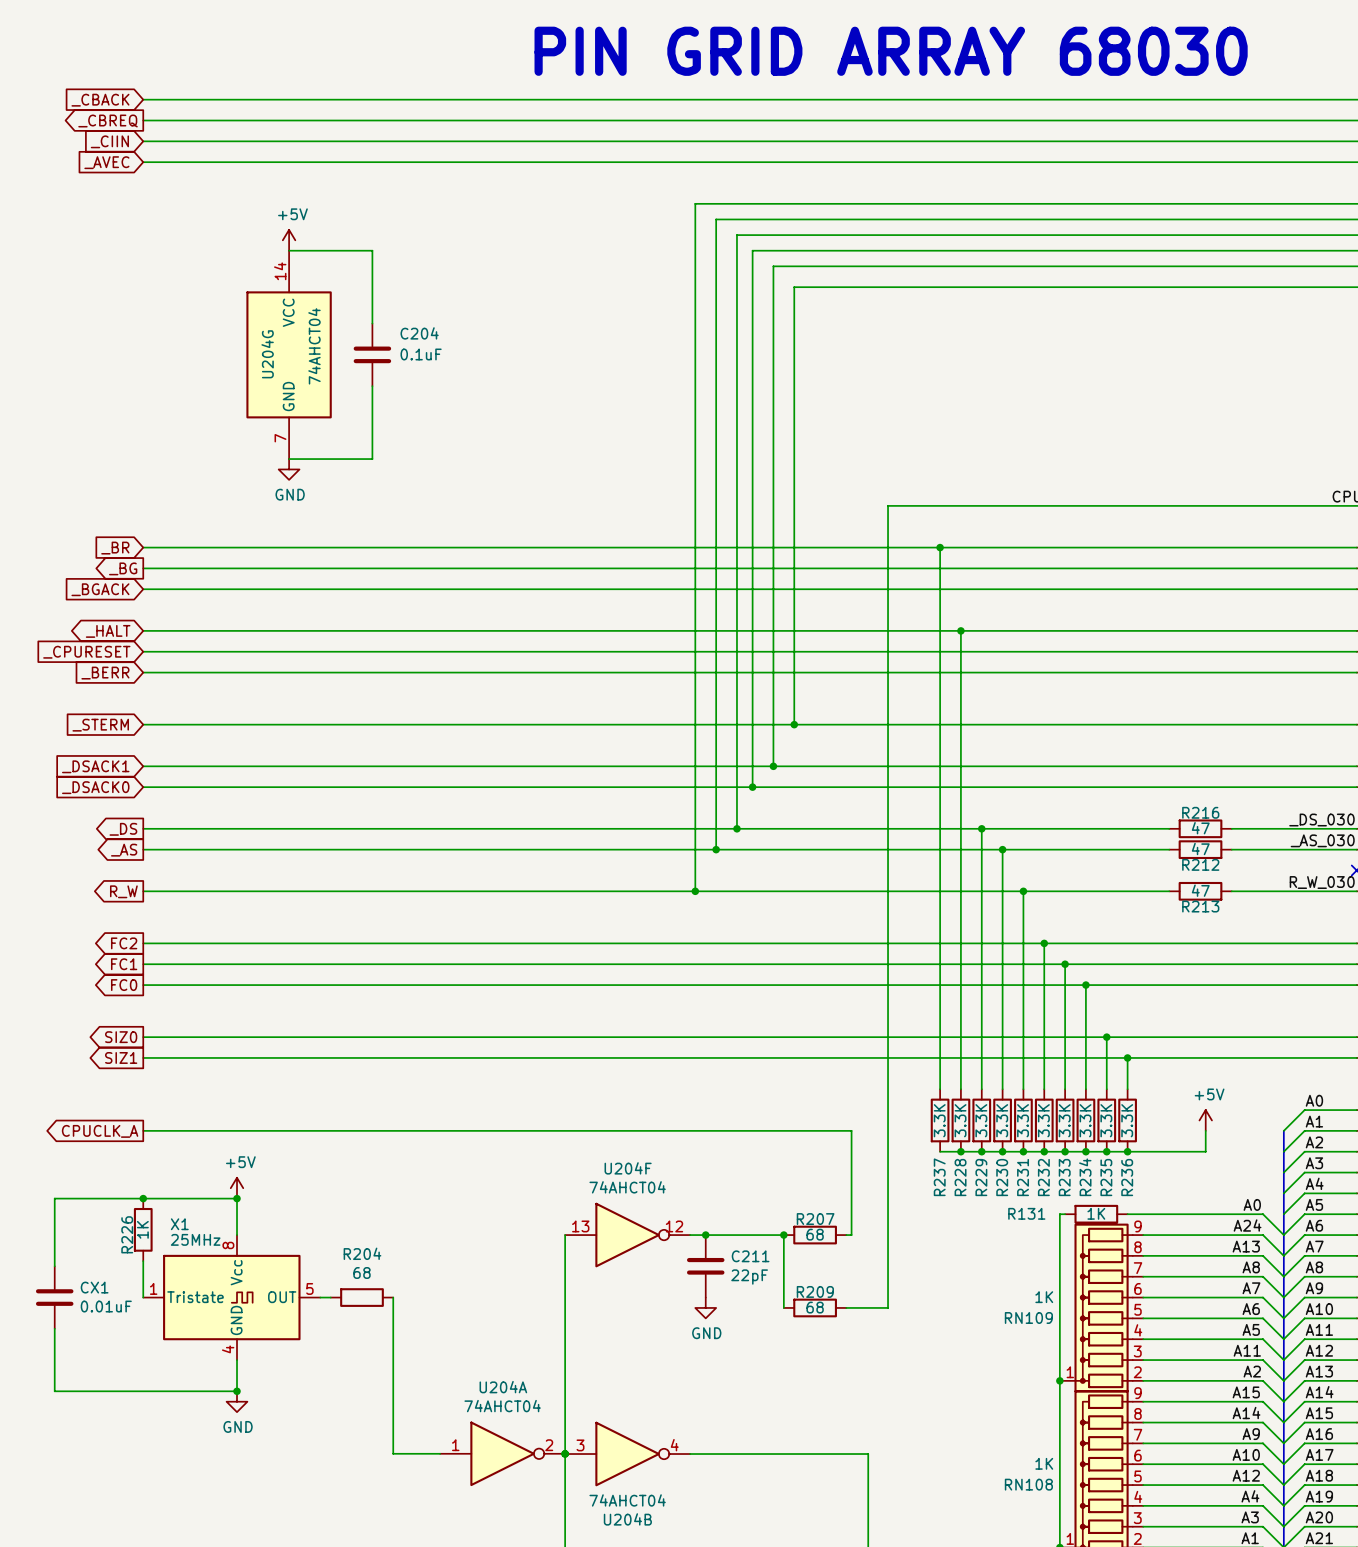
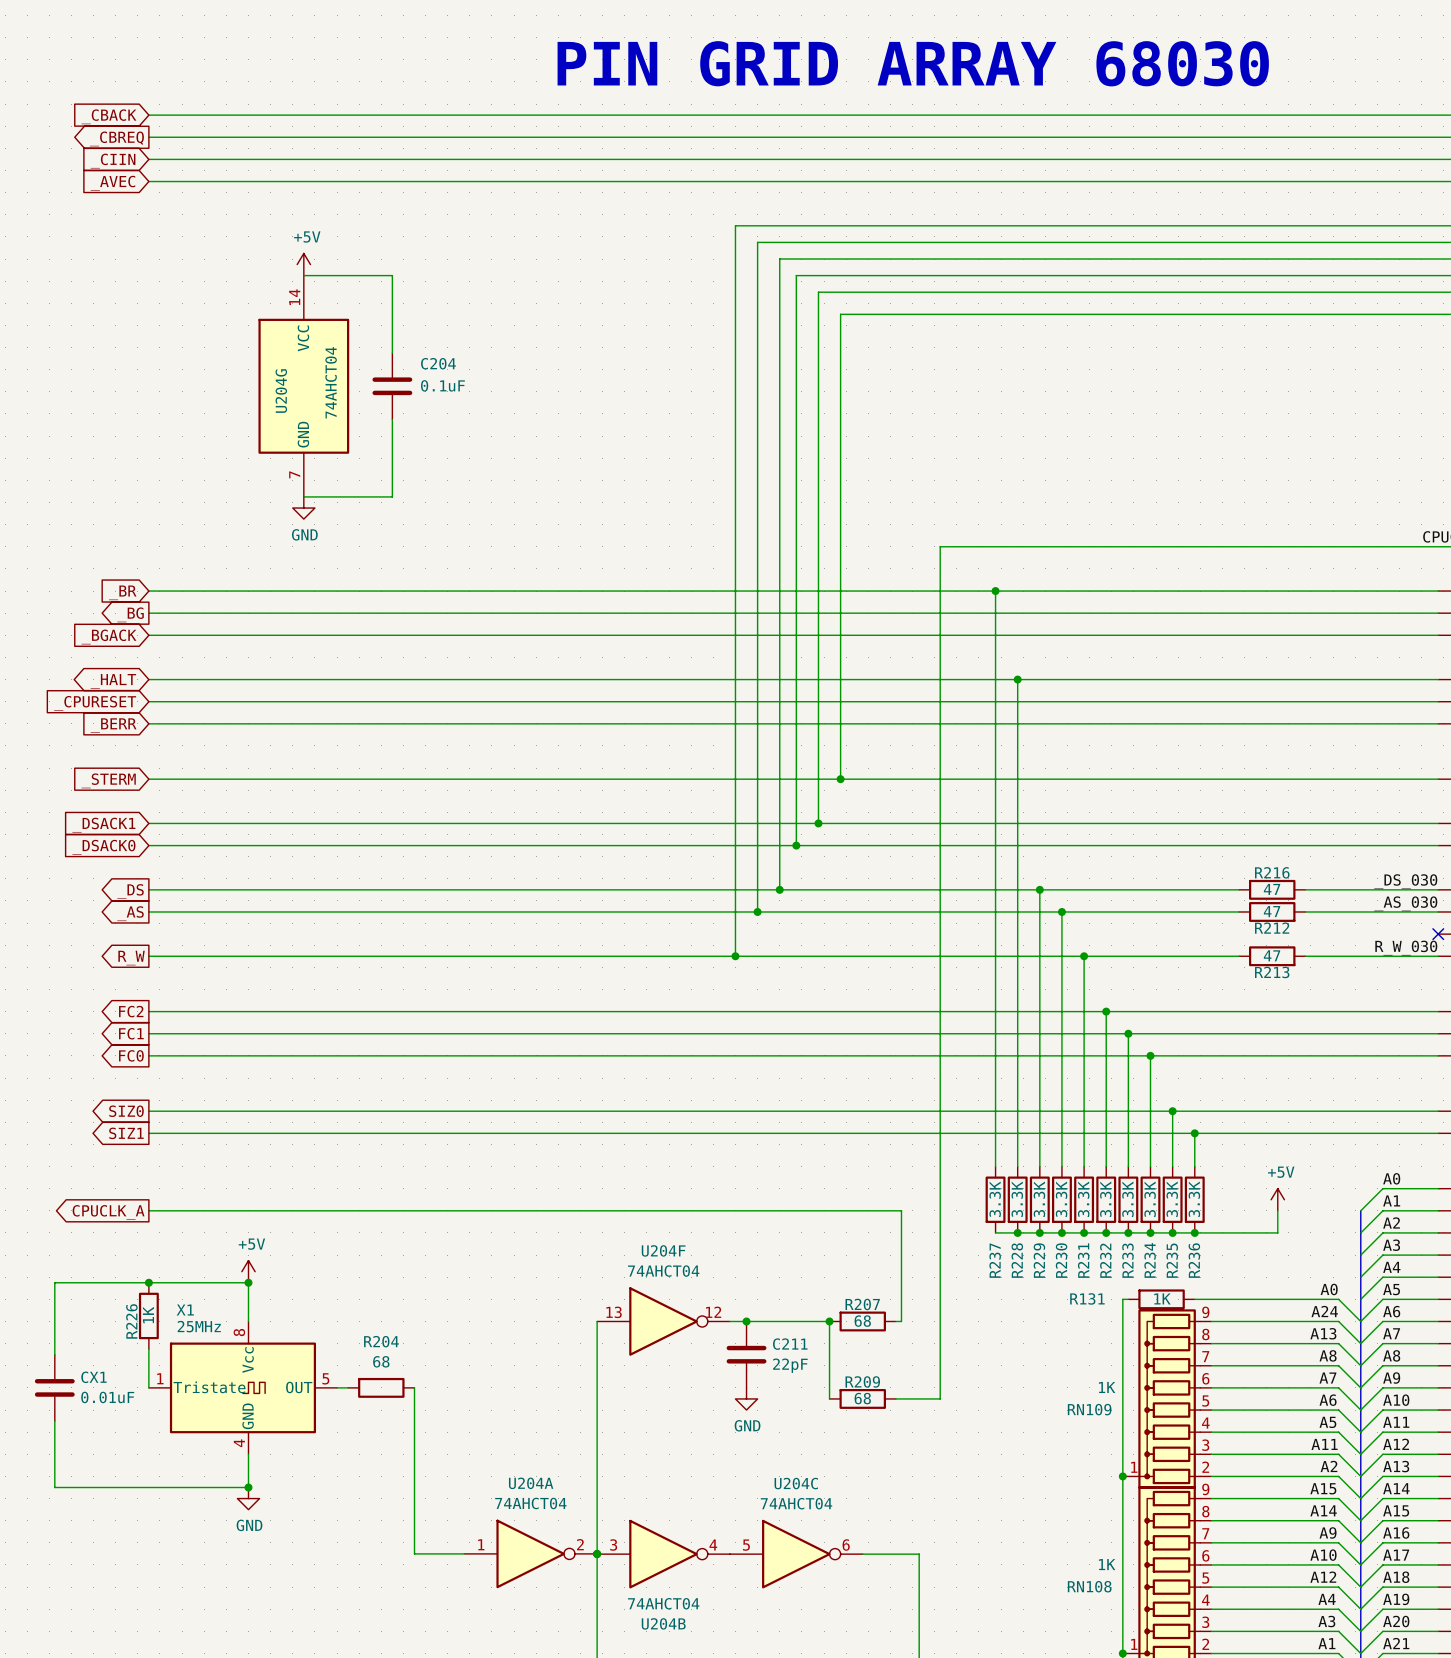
U204C: none -> 74AHCT04 (796, 1554)

